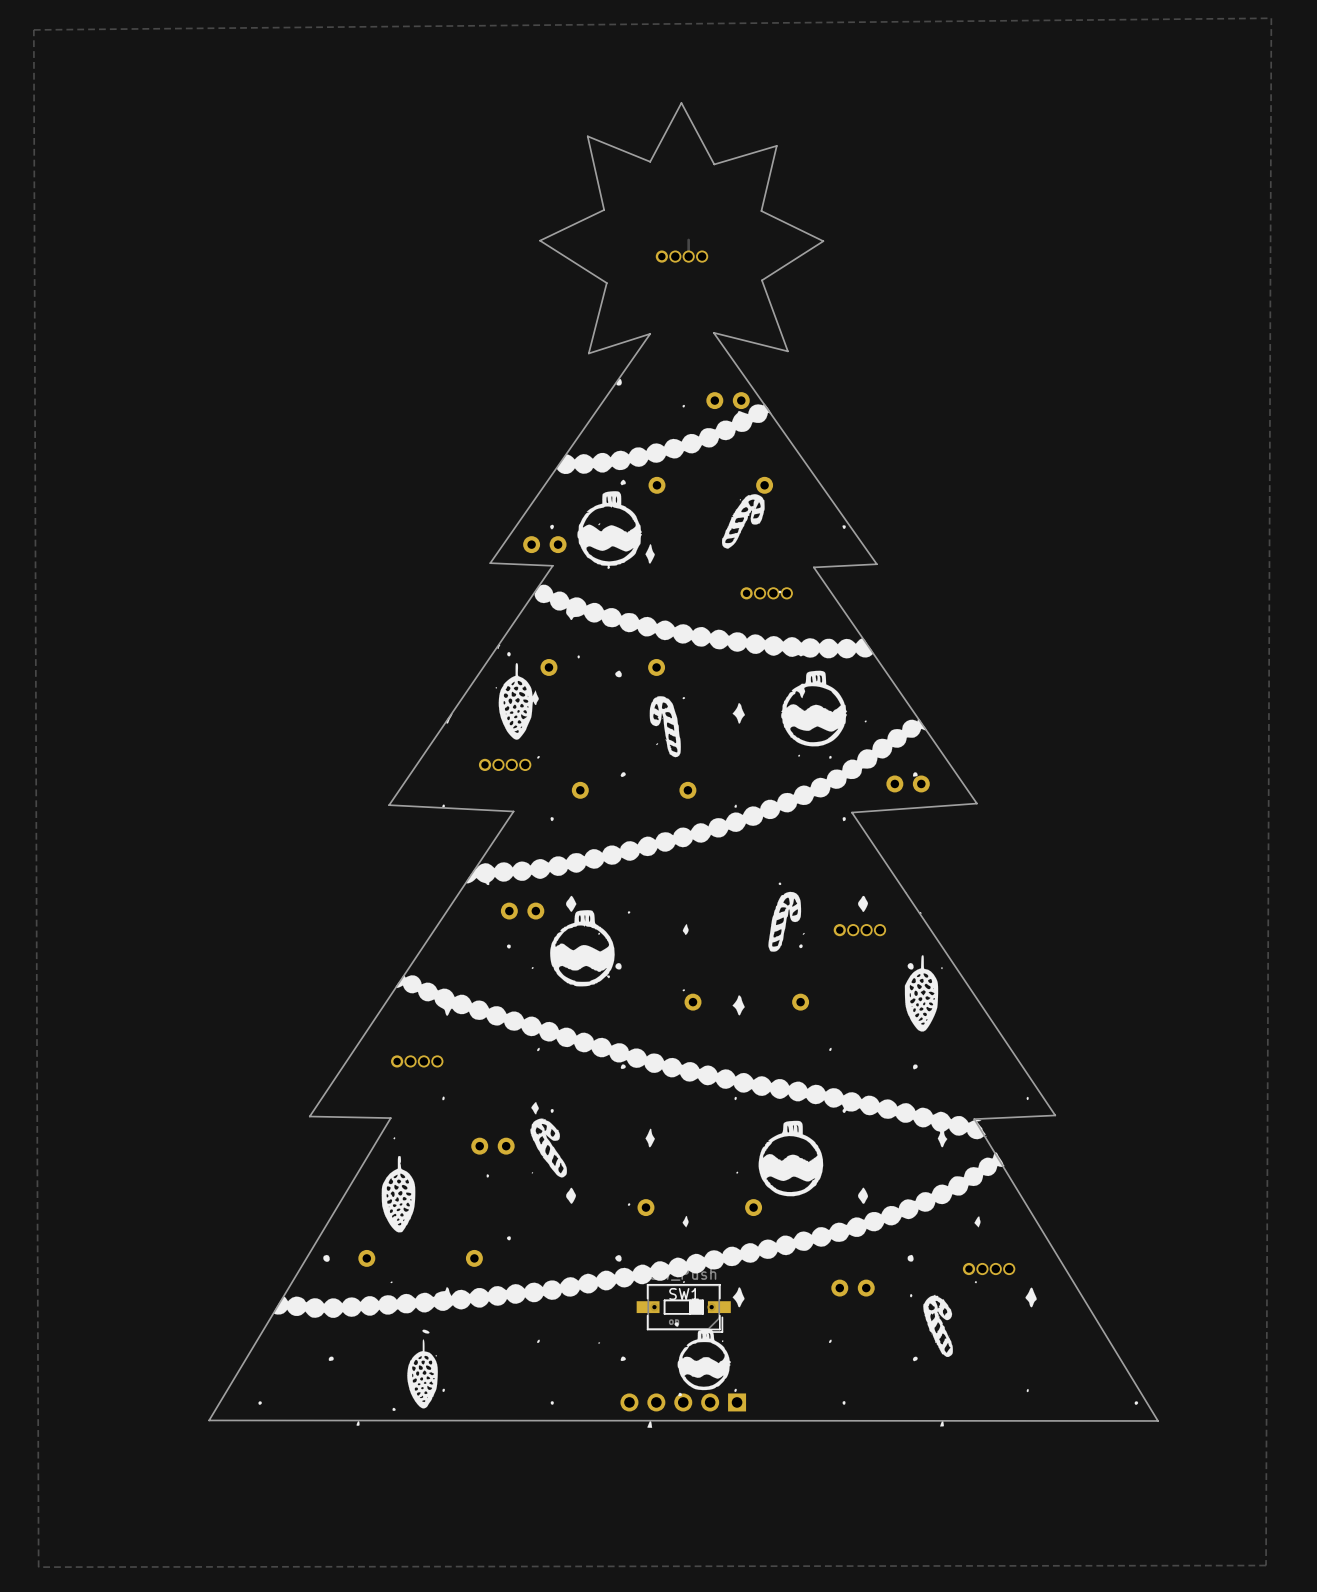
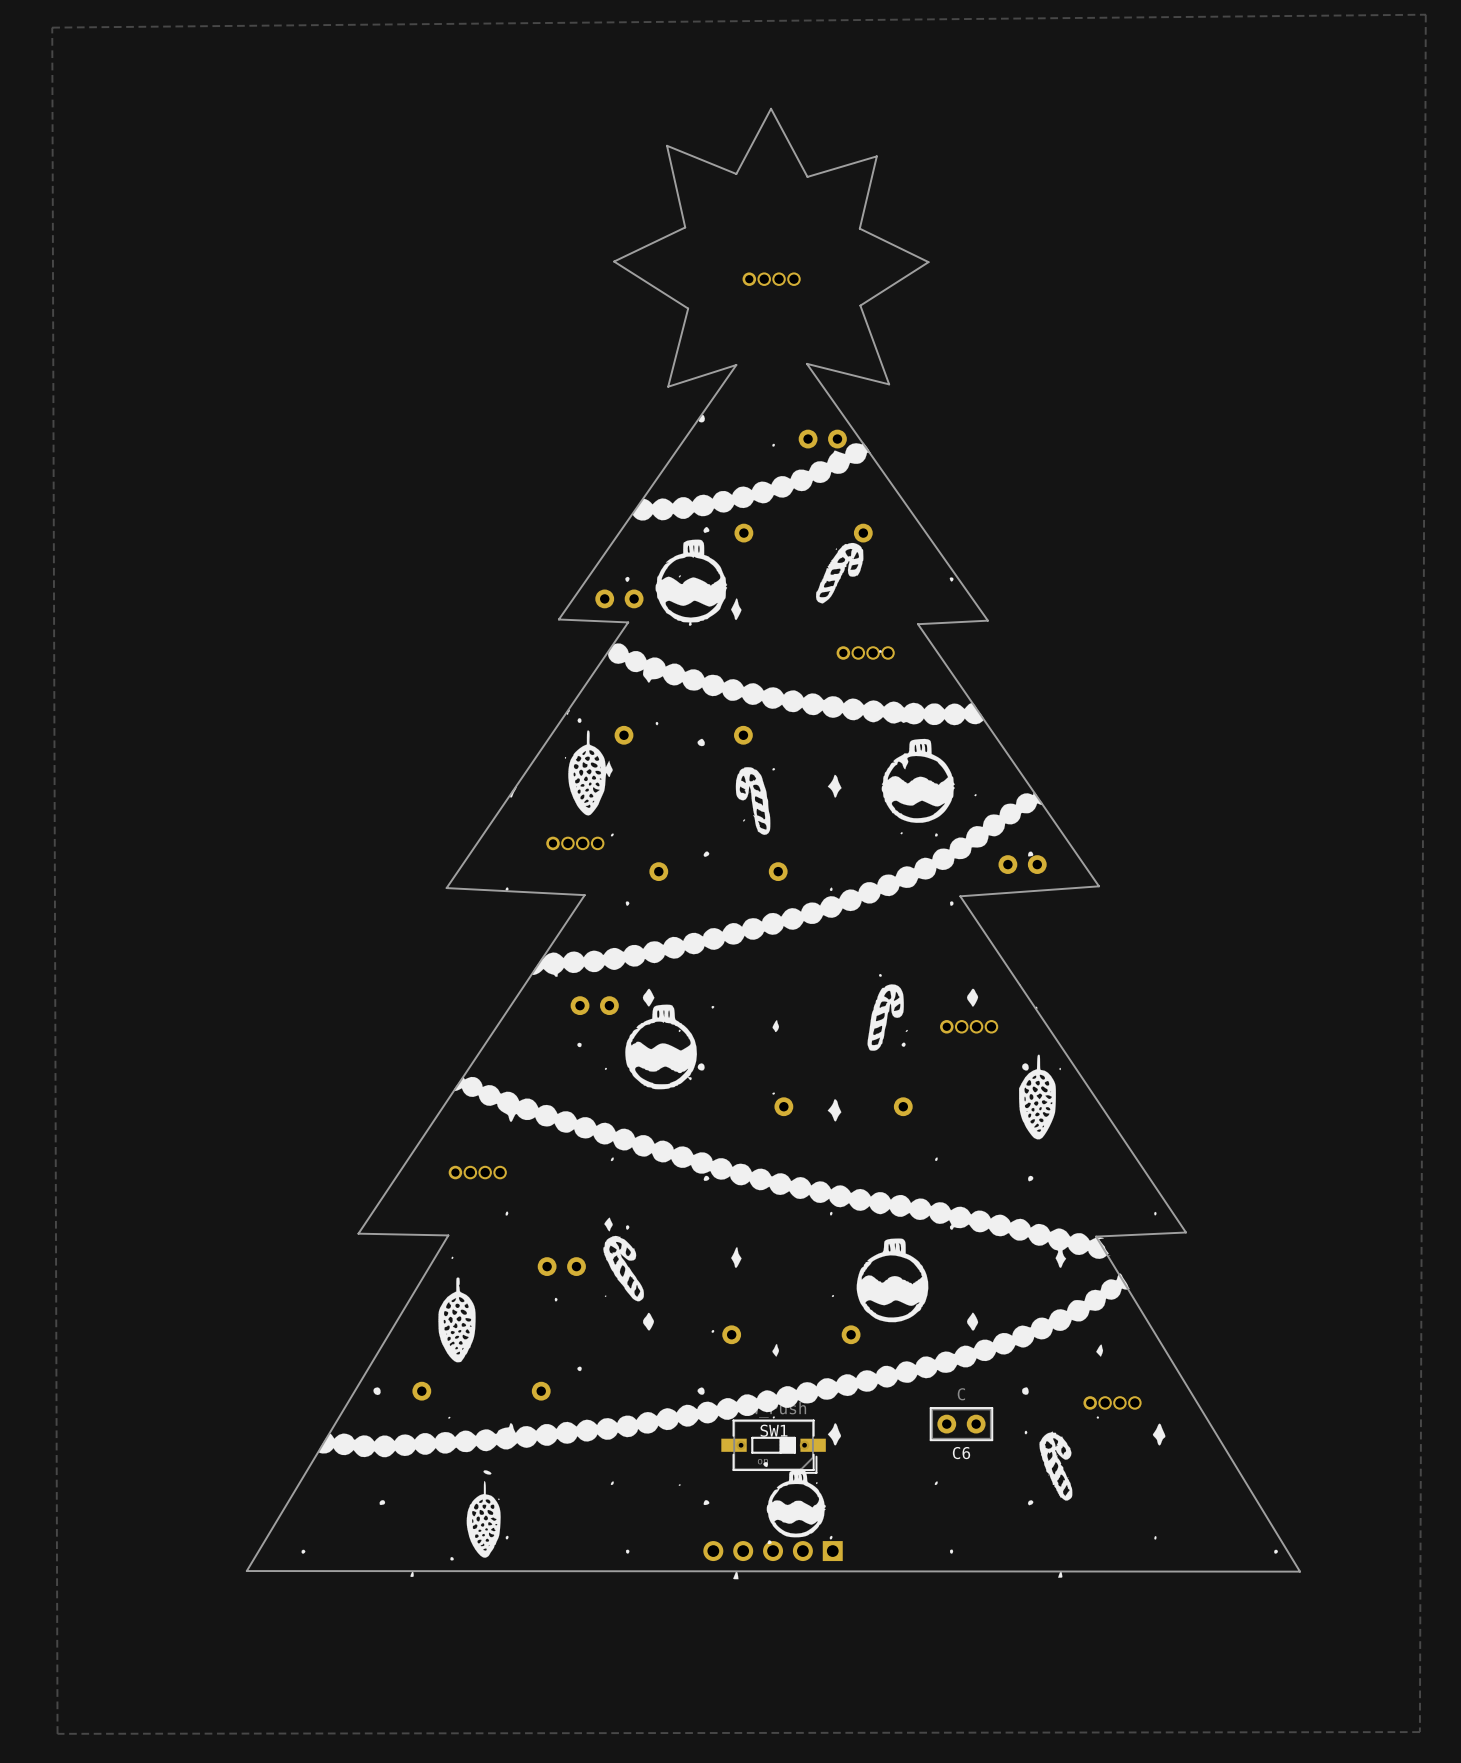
track: (688, 239) (688, 256) -> none
C6 side: bottom (853, 1288) -> top (961, 1424)

